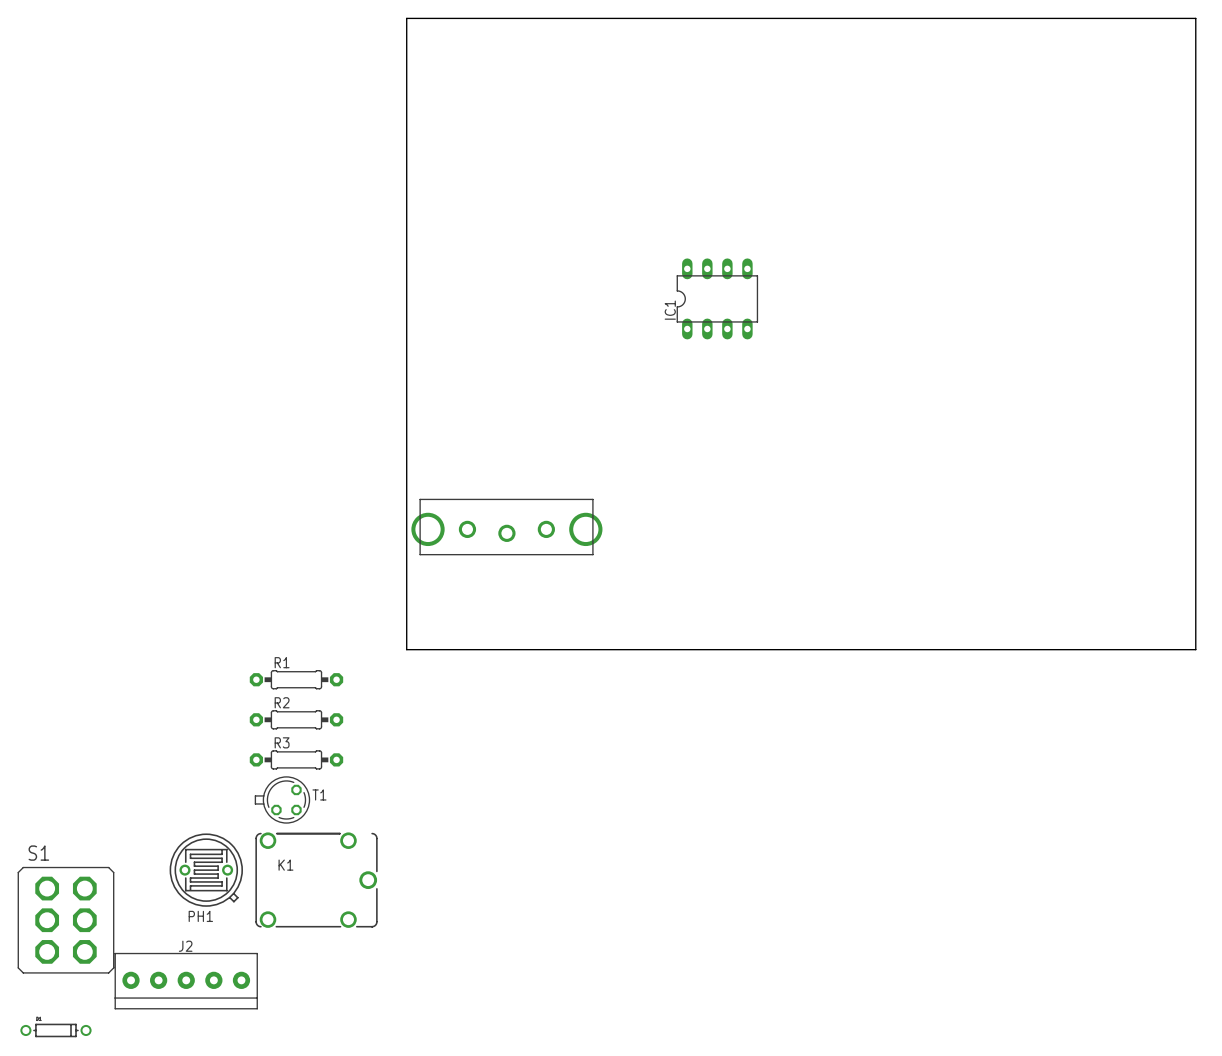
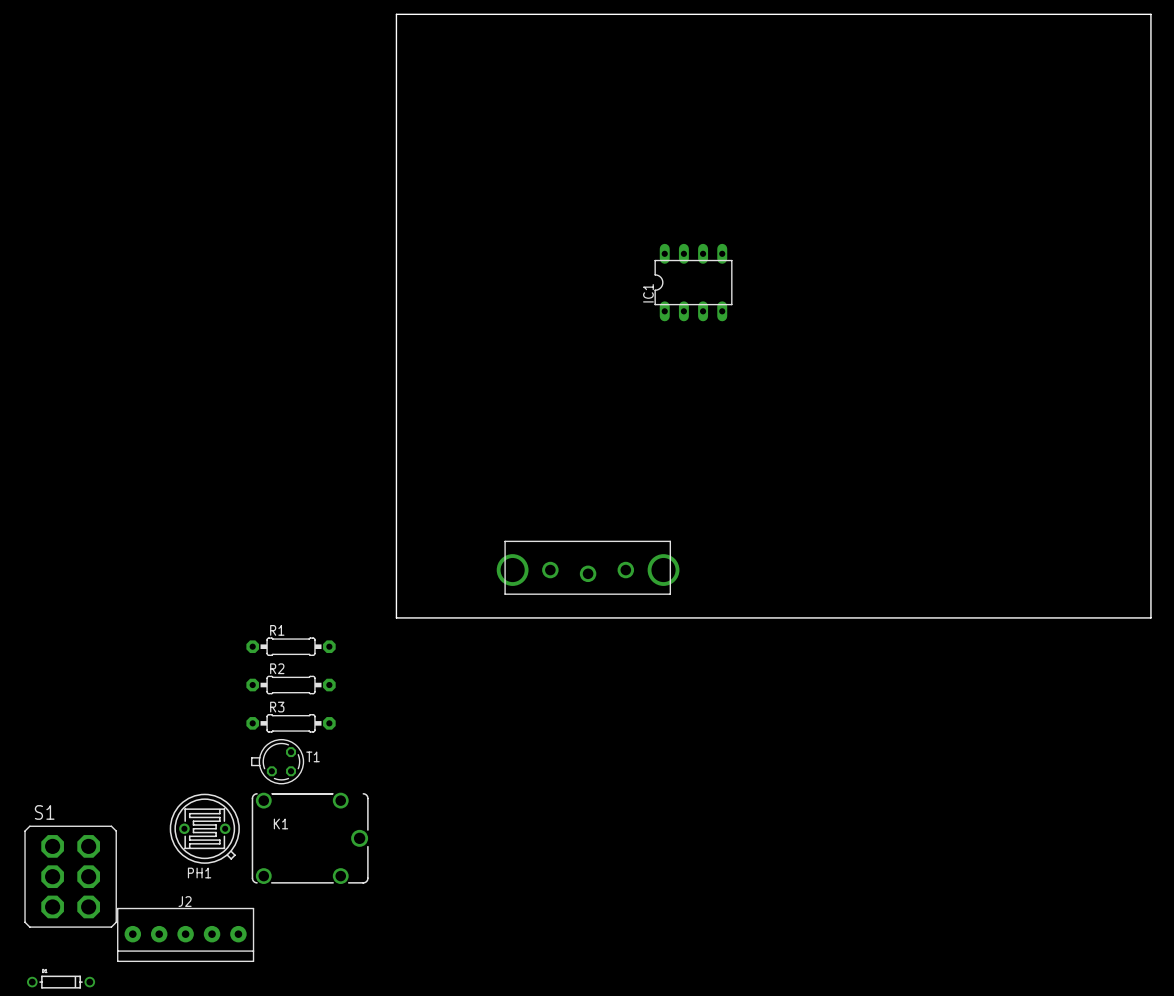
part position: (506, 527) -> (588, 567)

